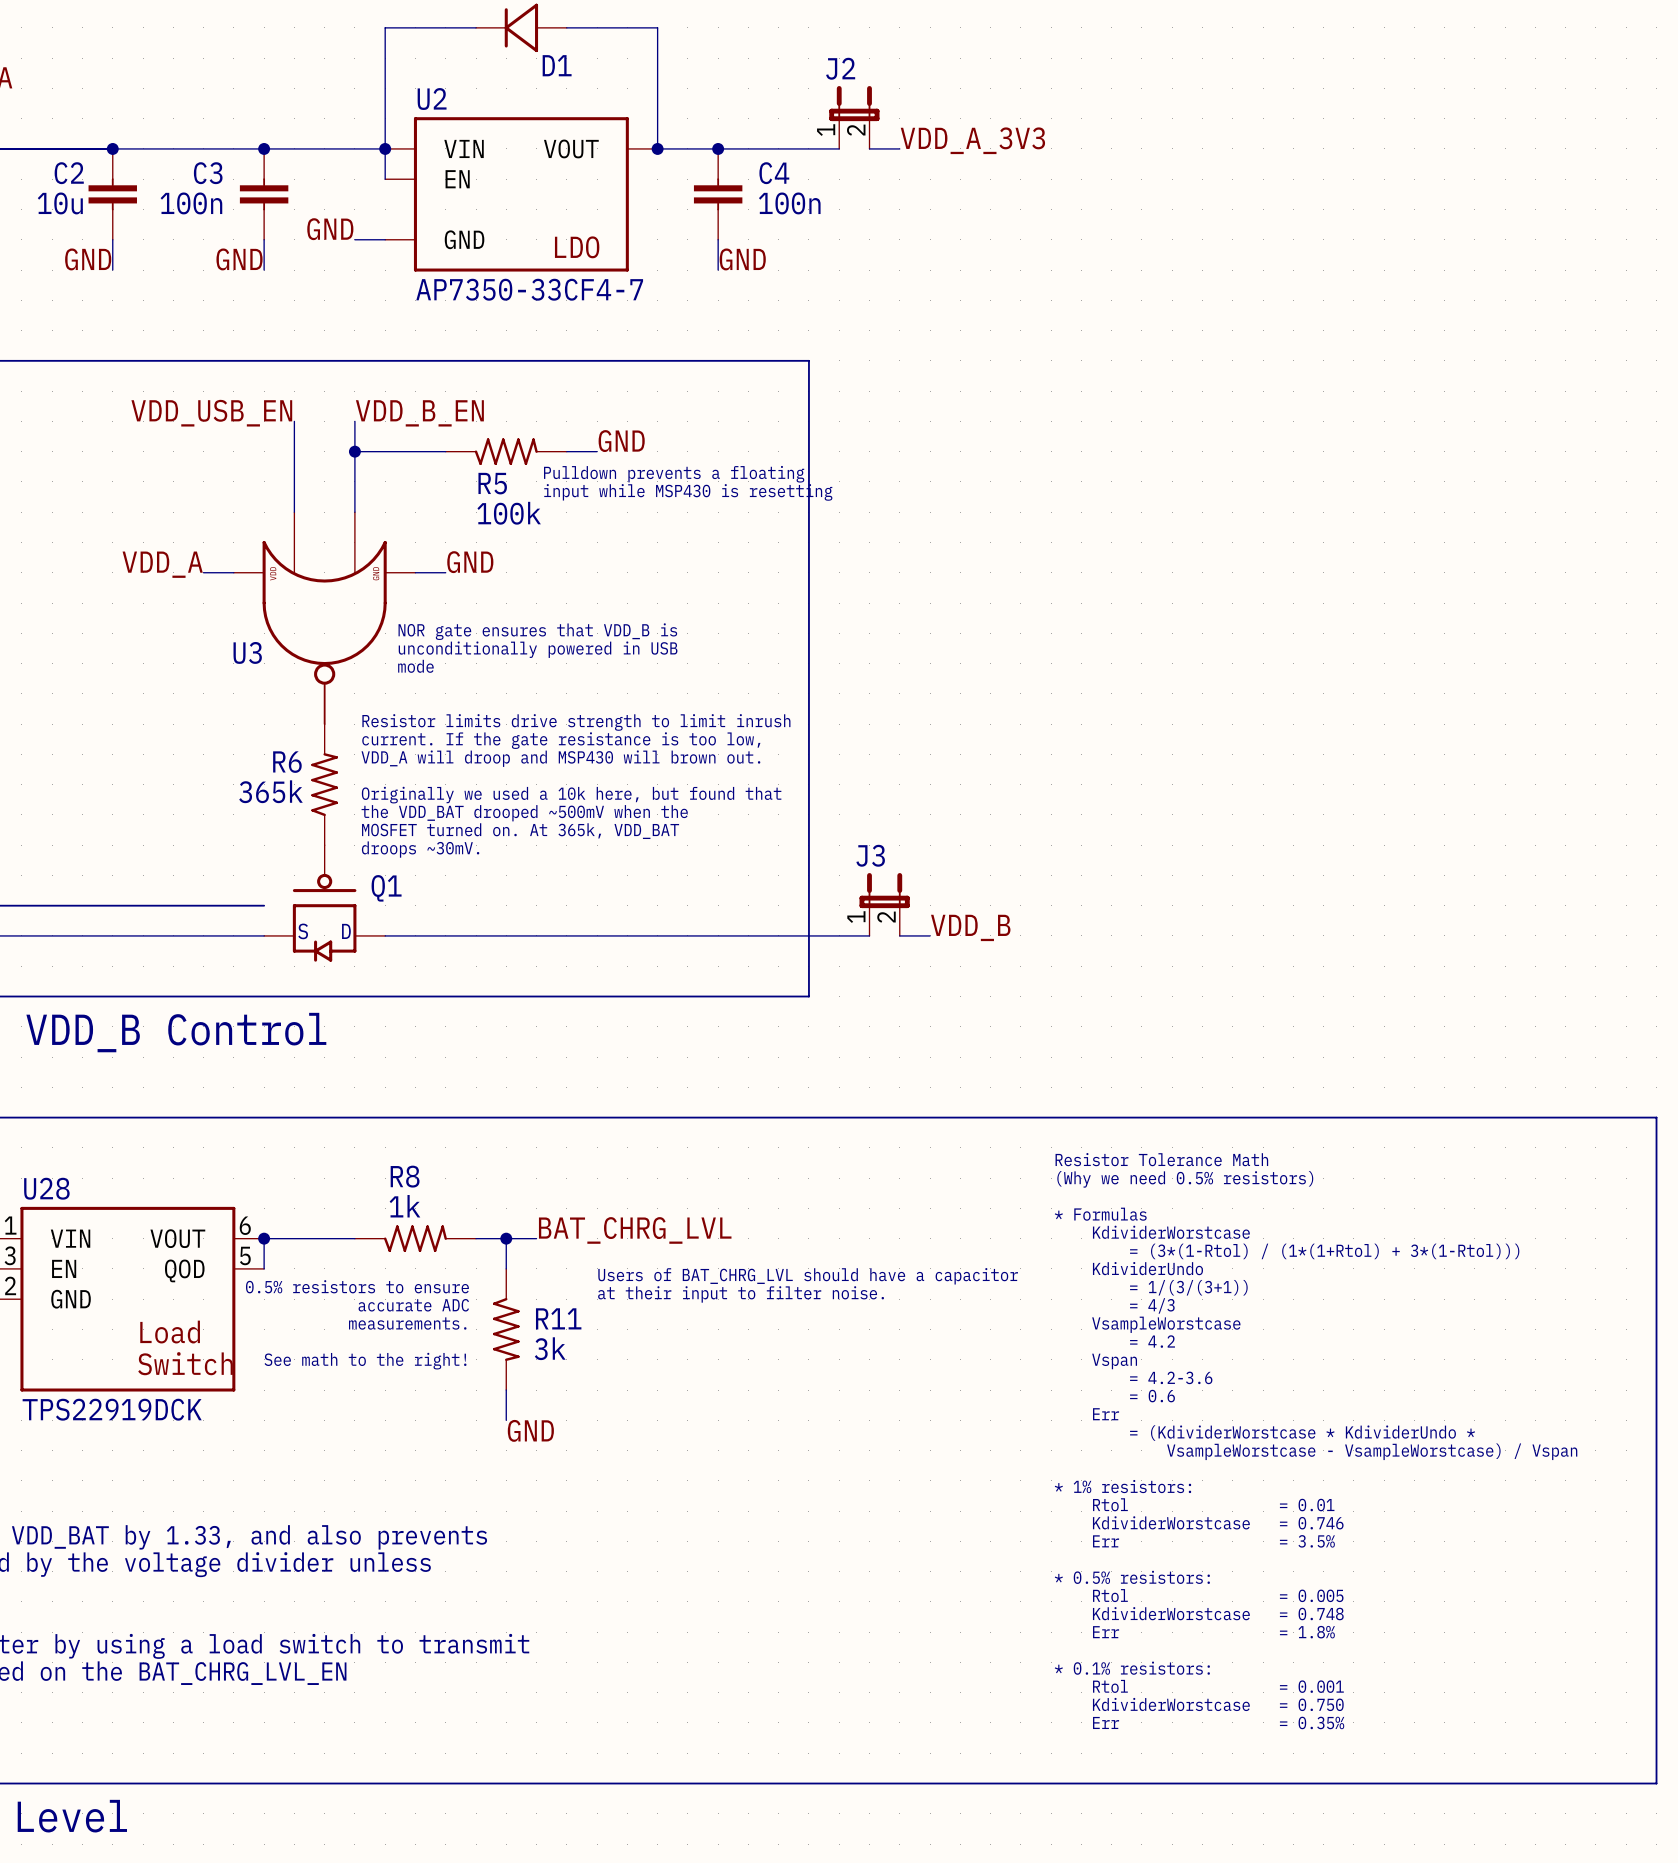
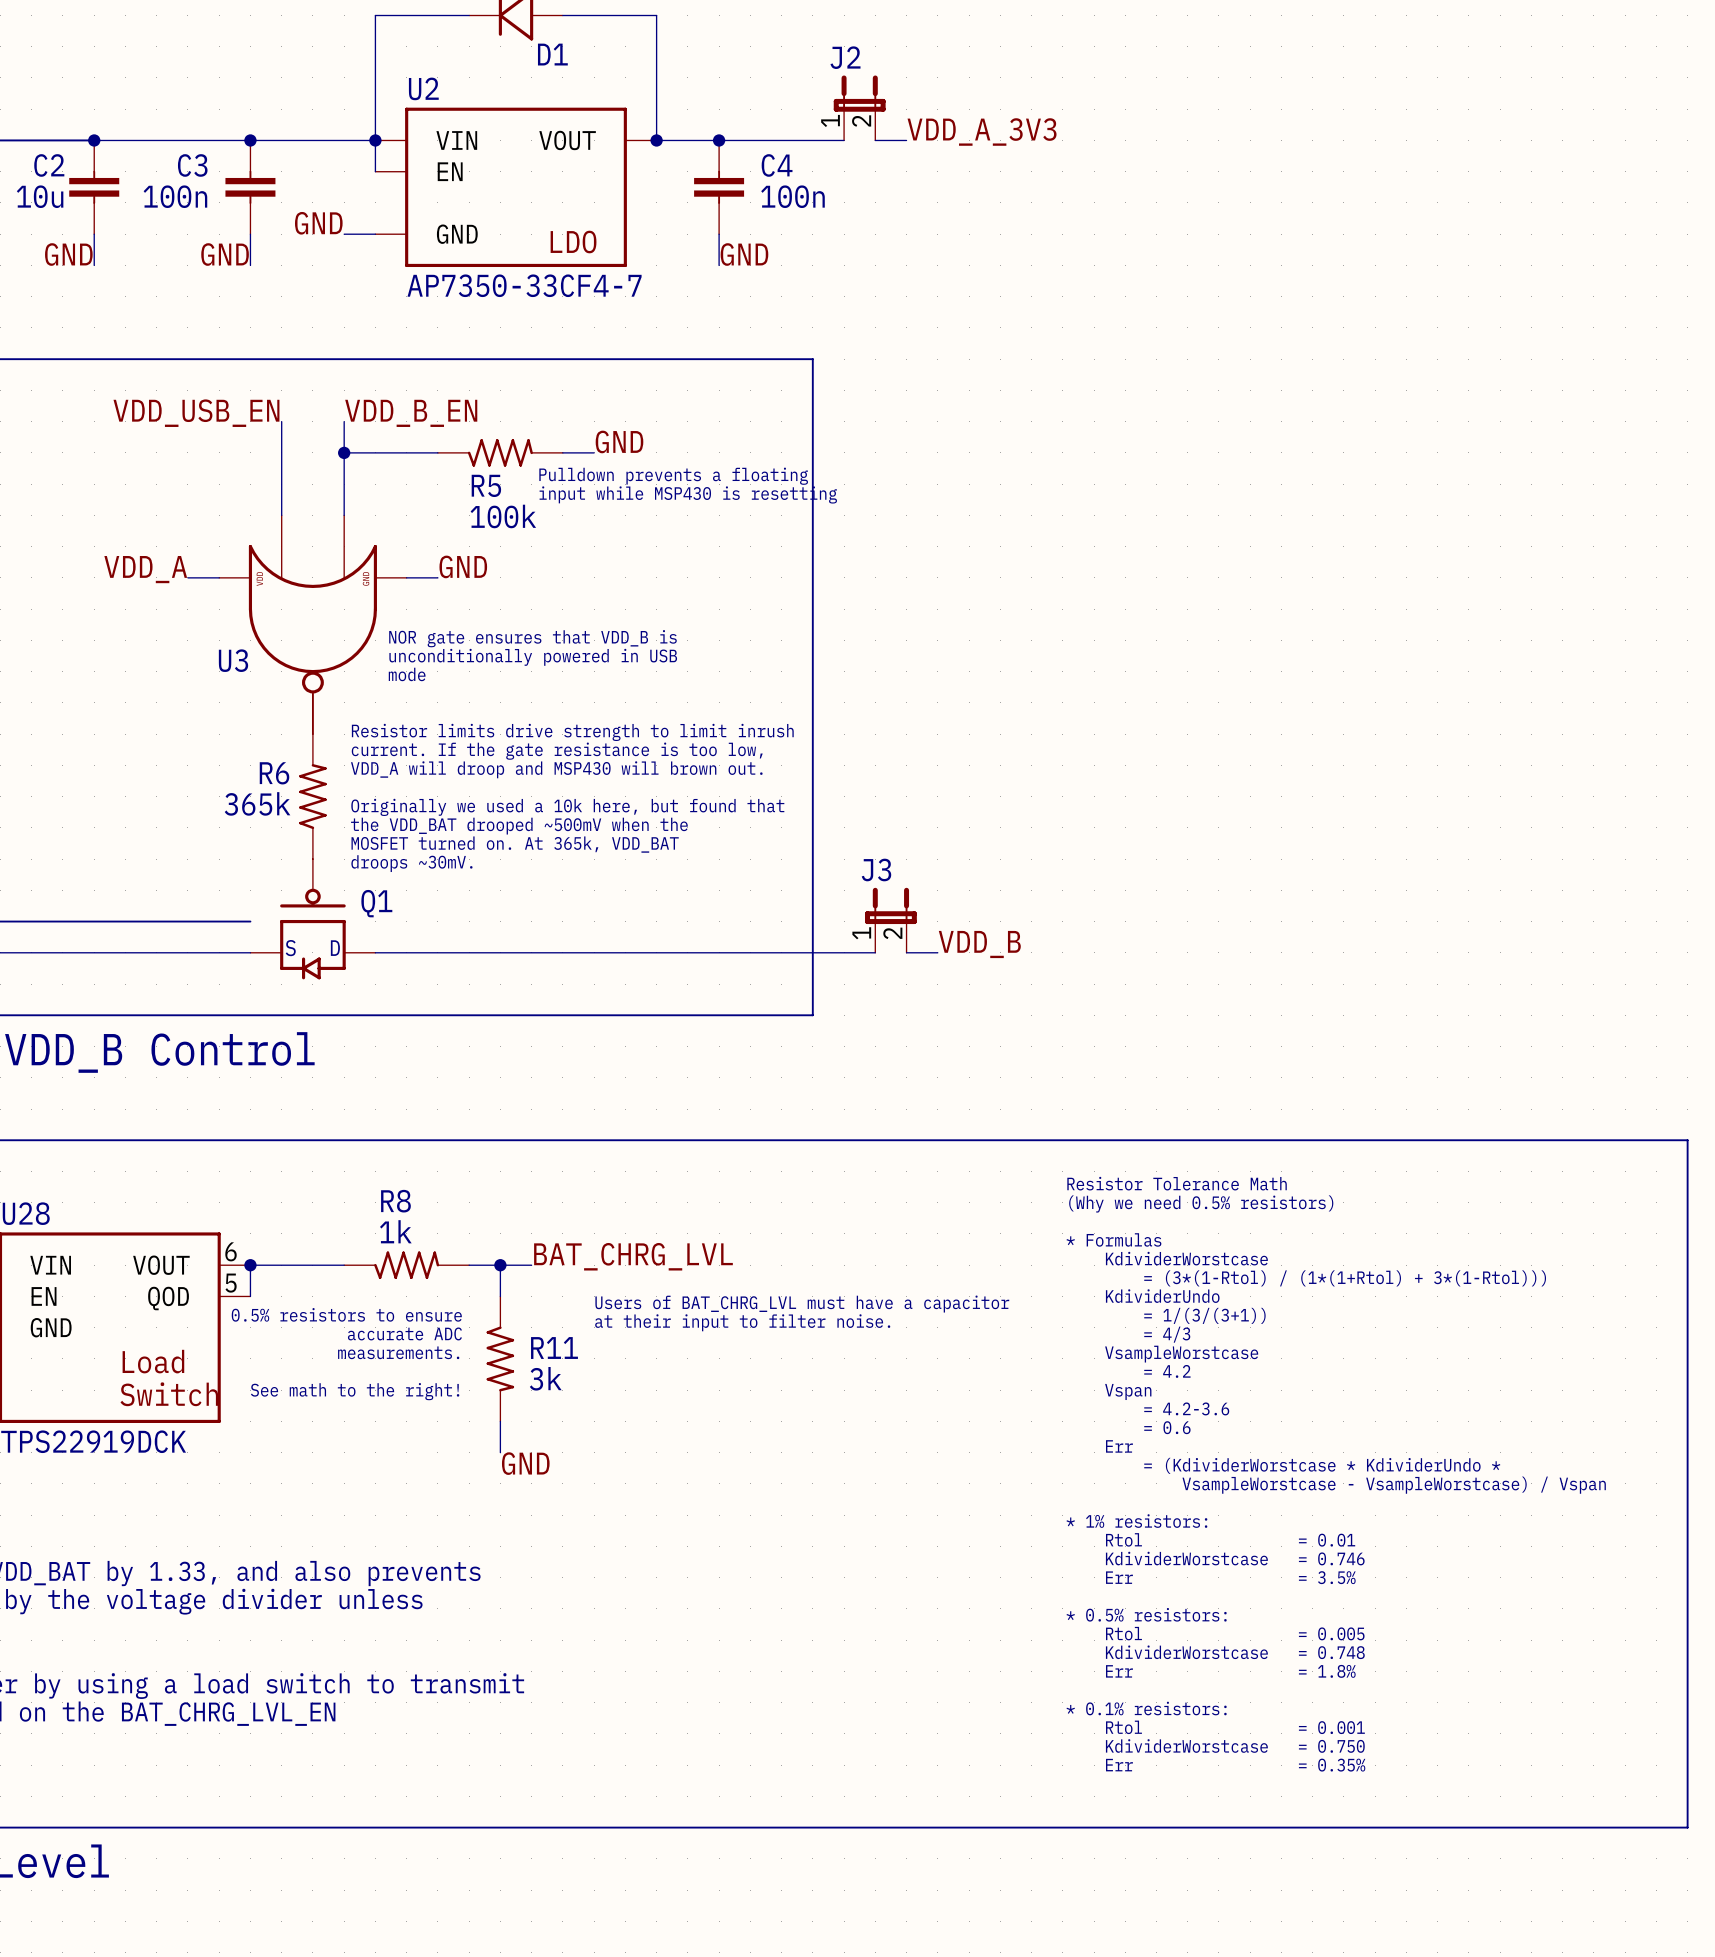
text: Users of BAT_CHRG_LVL should have a capacitor (808, 1276) -> Users of BAT_CHRG_LVL must have a capacitor (802, 1304)

